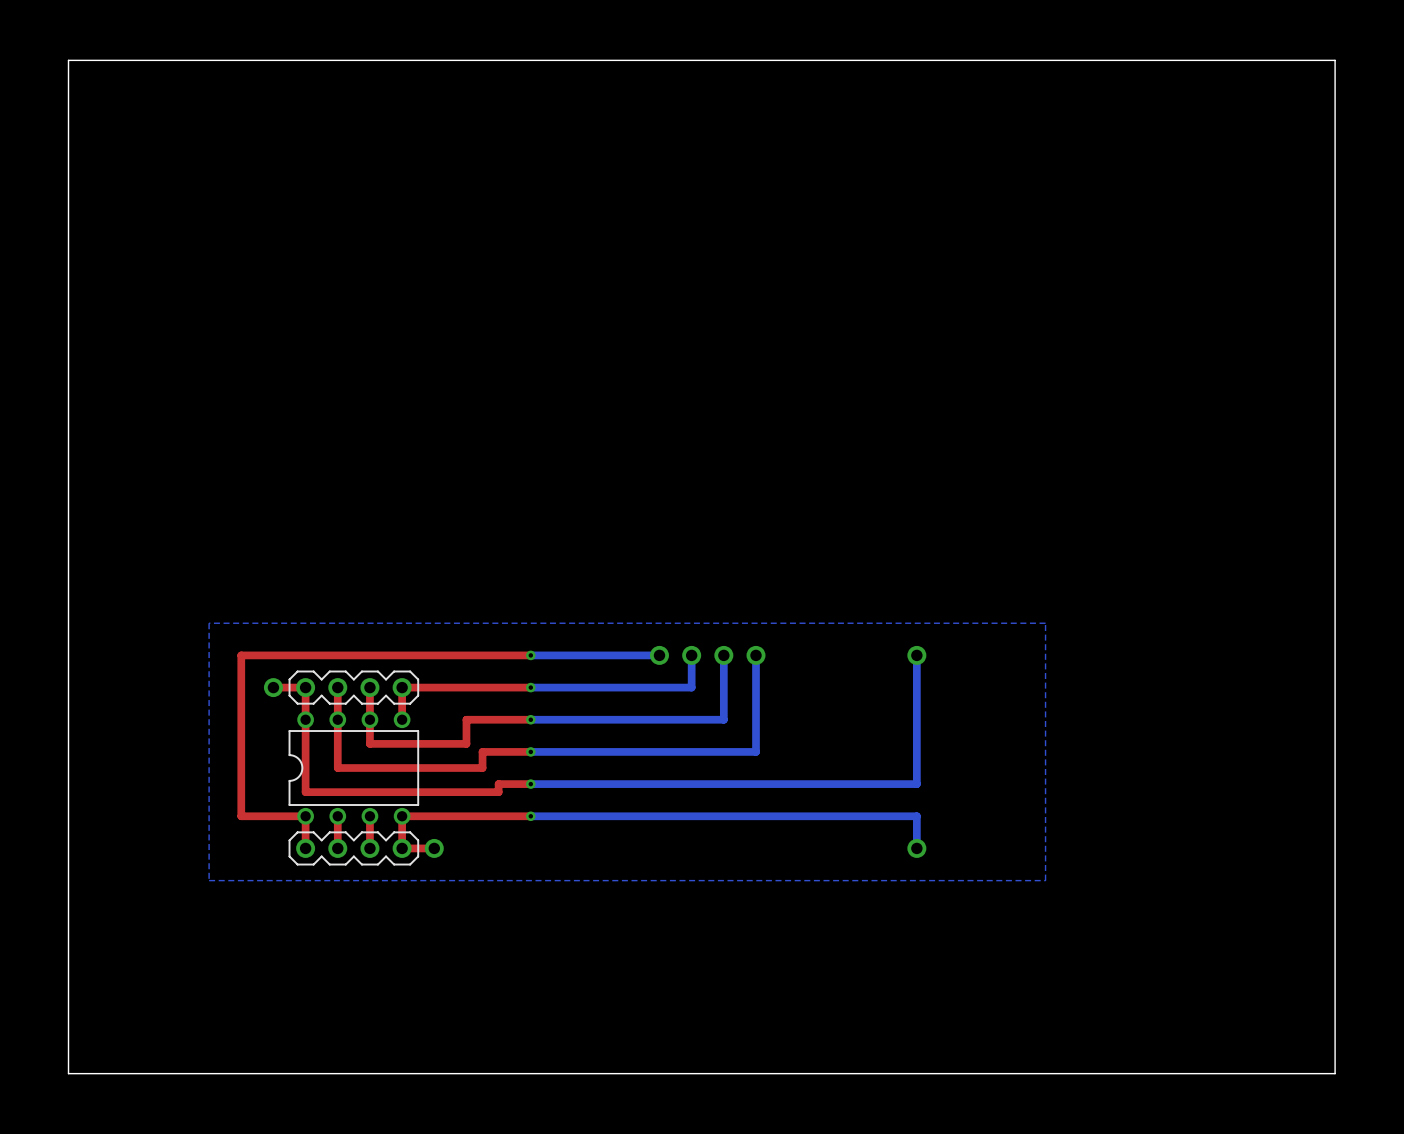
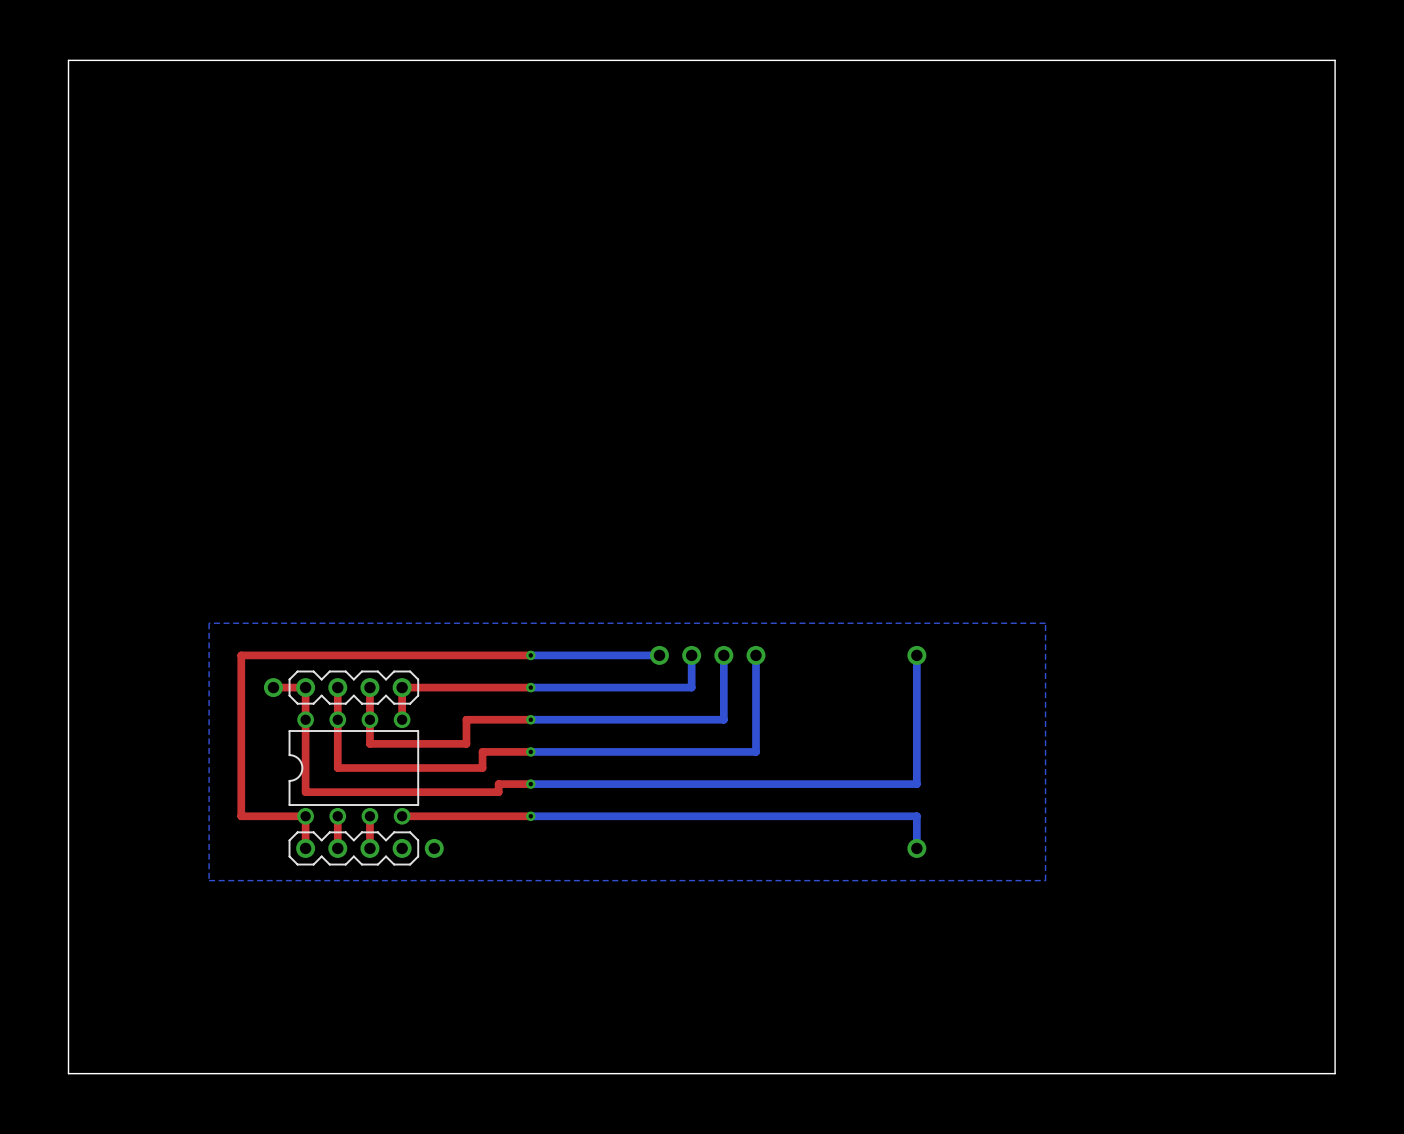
top track: (402, 816) (402, 848) (434, 848) -> none

